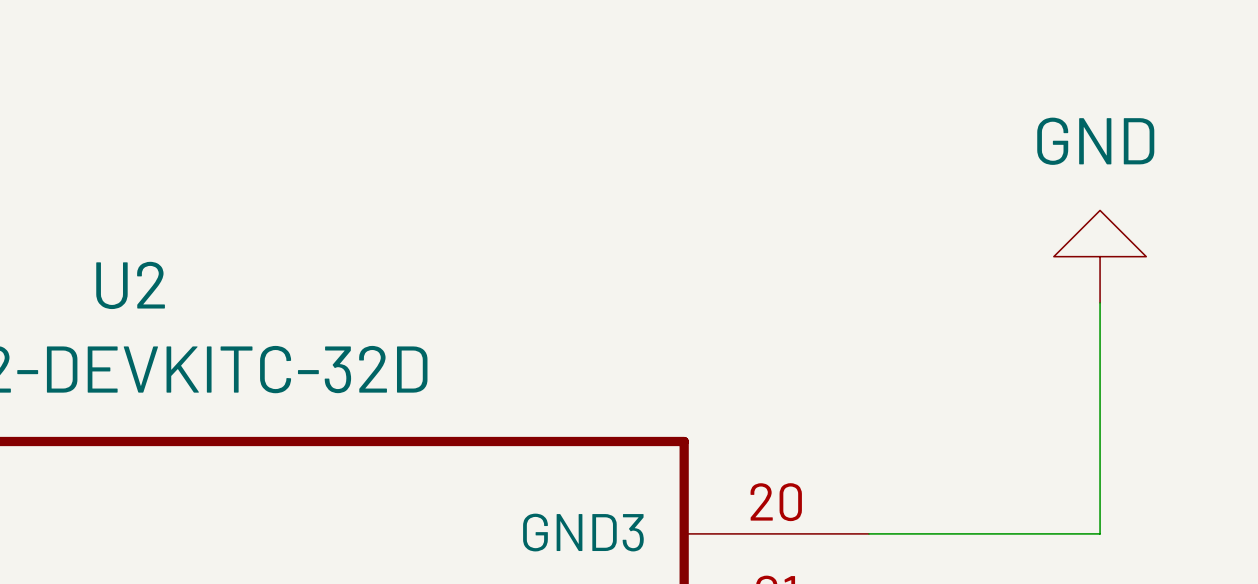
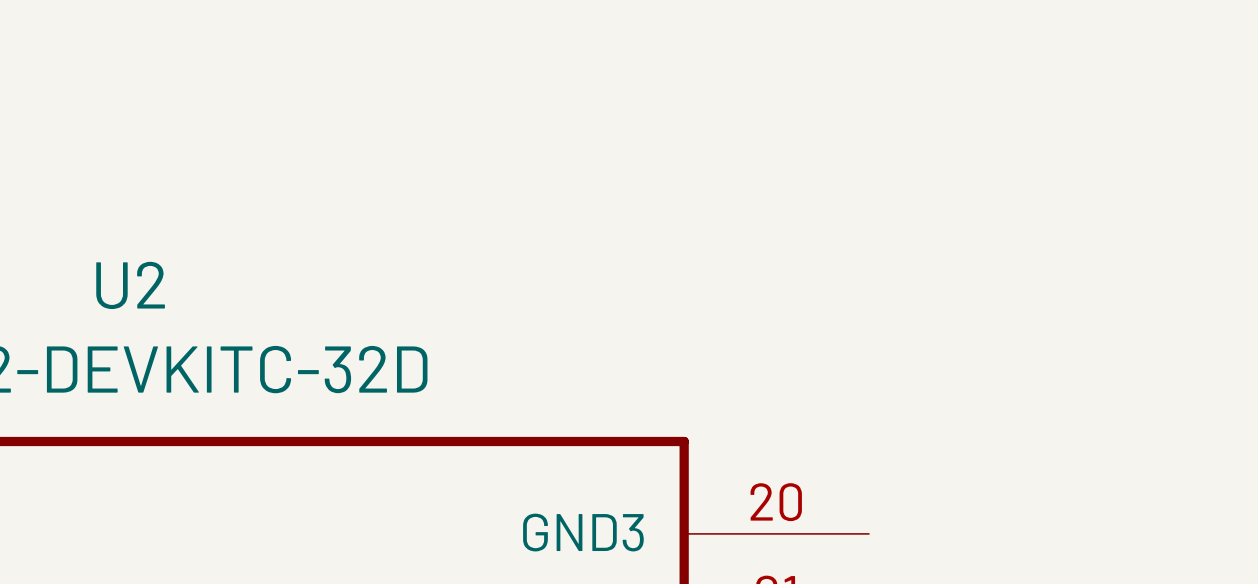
power symbol: GND (1100, 256) -> none
wire: (1100, 302) (1100, 533) (869, 533) -> none

